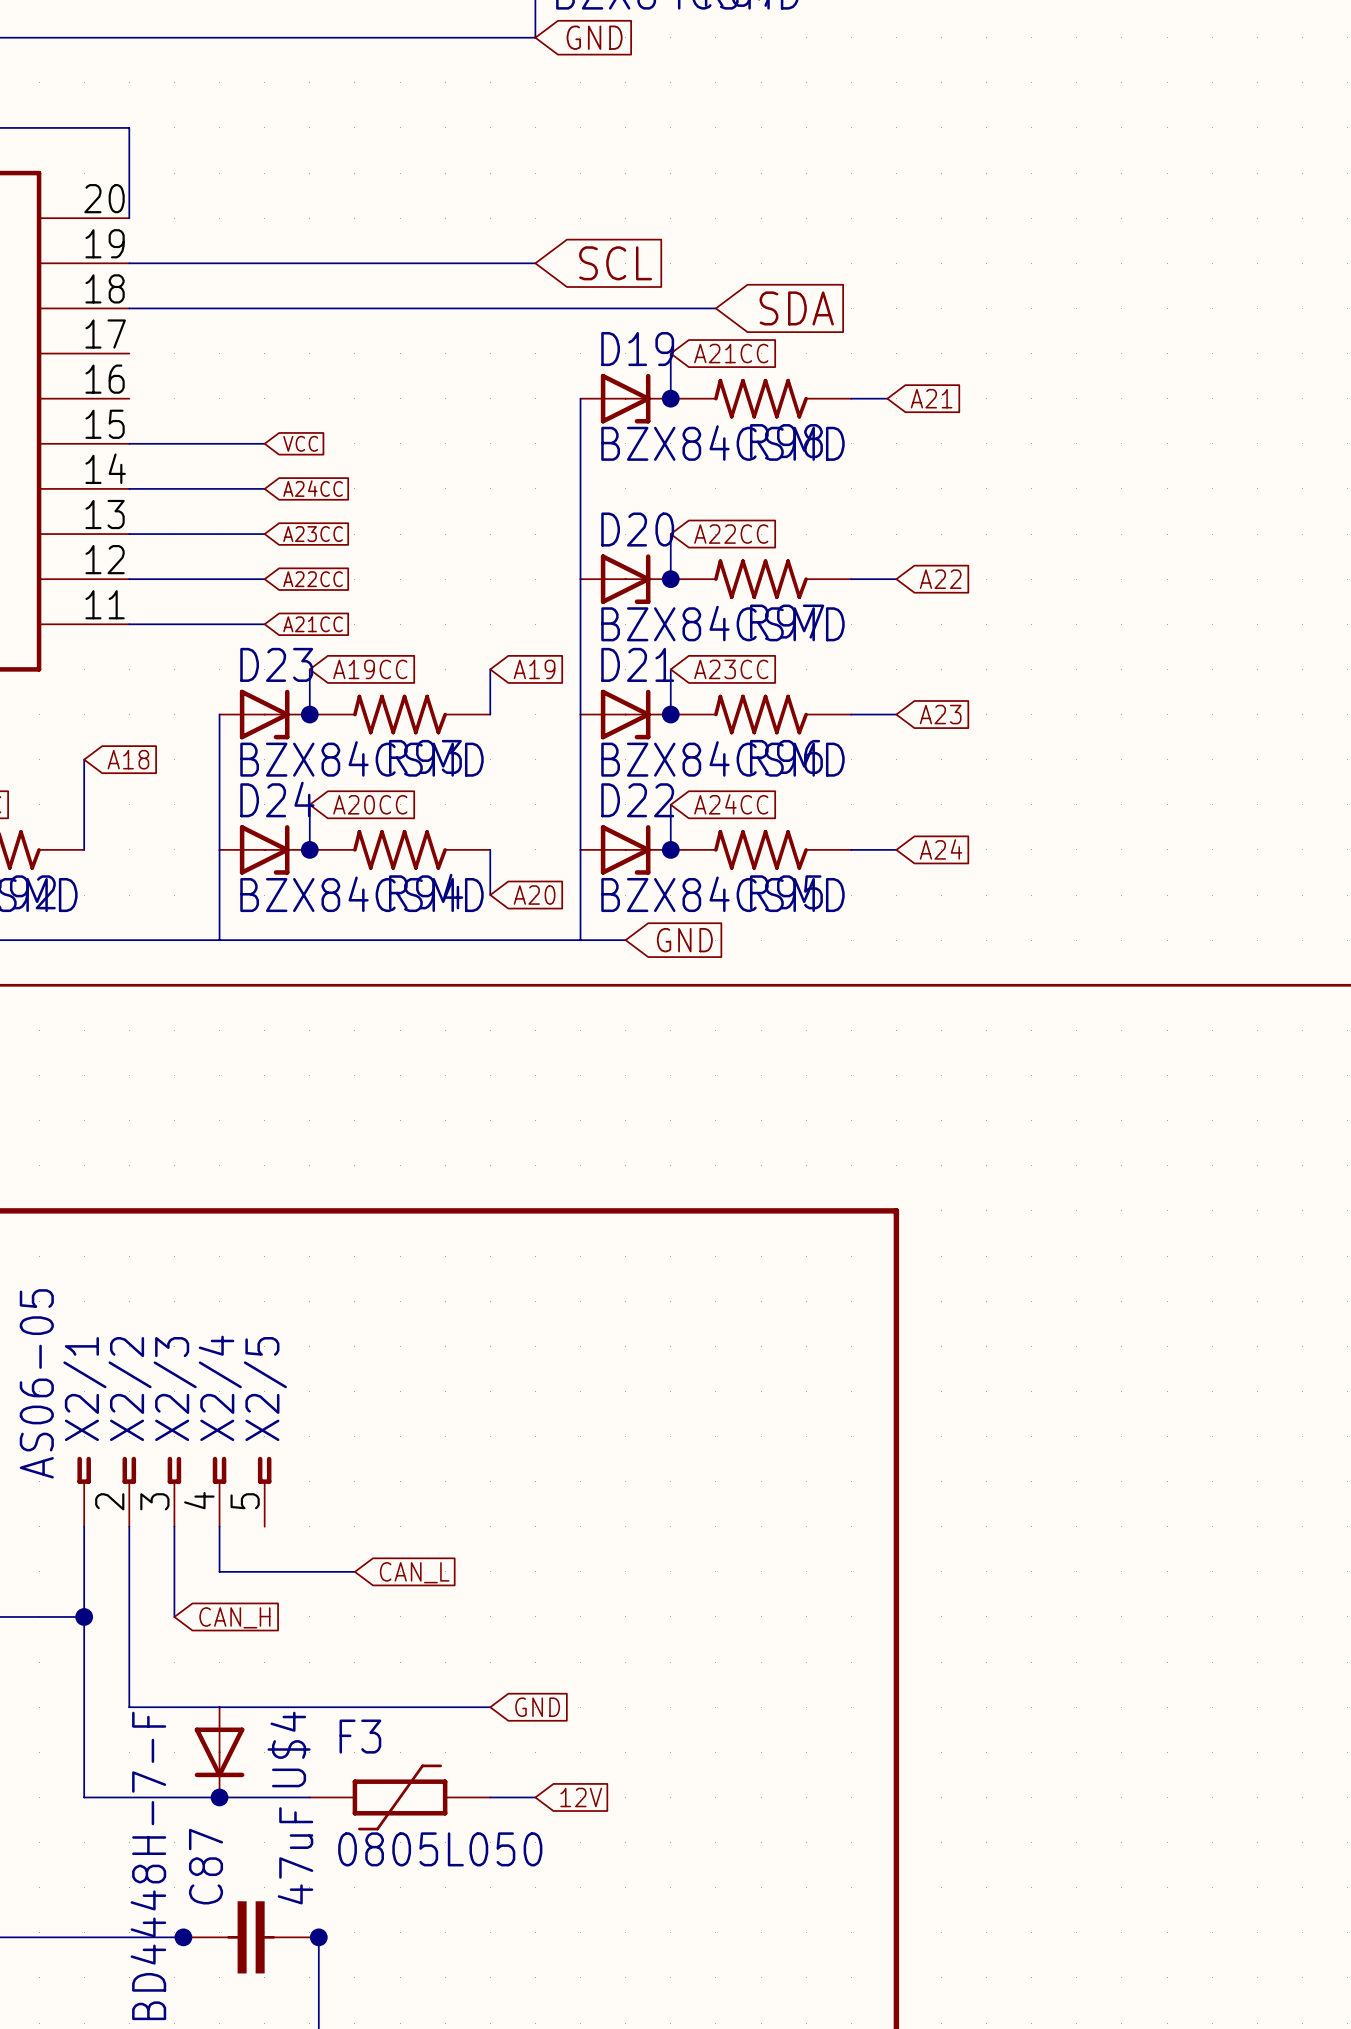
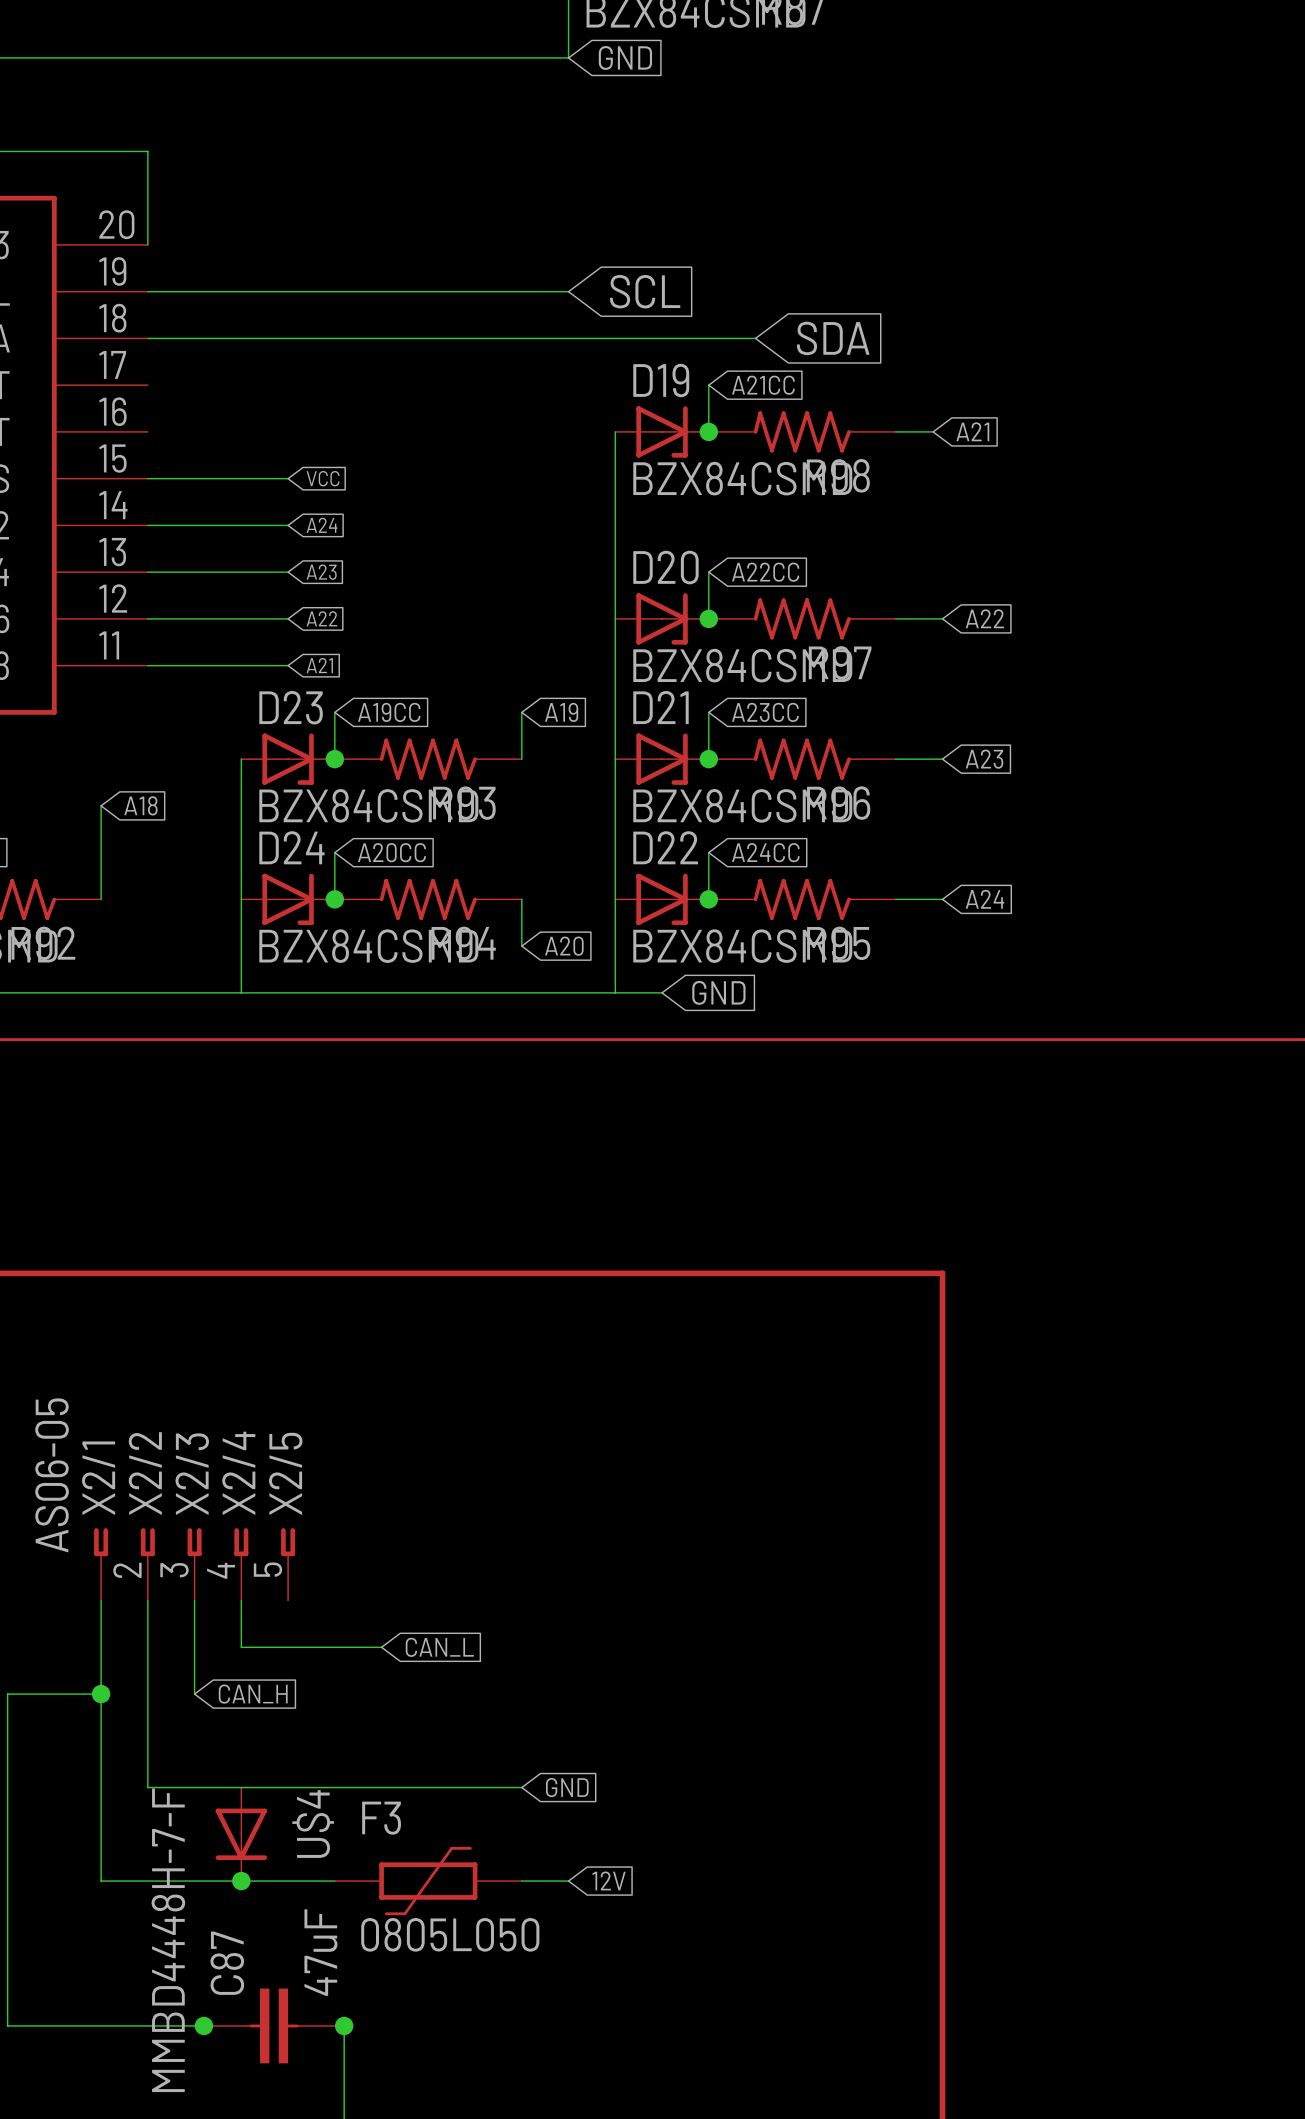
global label: A24CC (313, 488) -> A24 (322, 525)
global label: A23CC (313, 534) -> A23 (321, 572)
global label: A22CC (313, 579) -> A22 (321, 618)
global label: A21CC (313, 624) -> A21 (319, 665)

